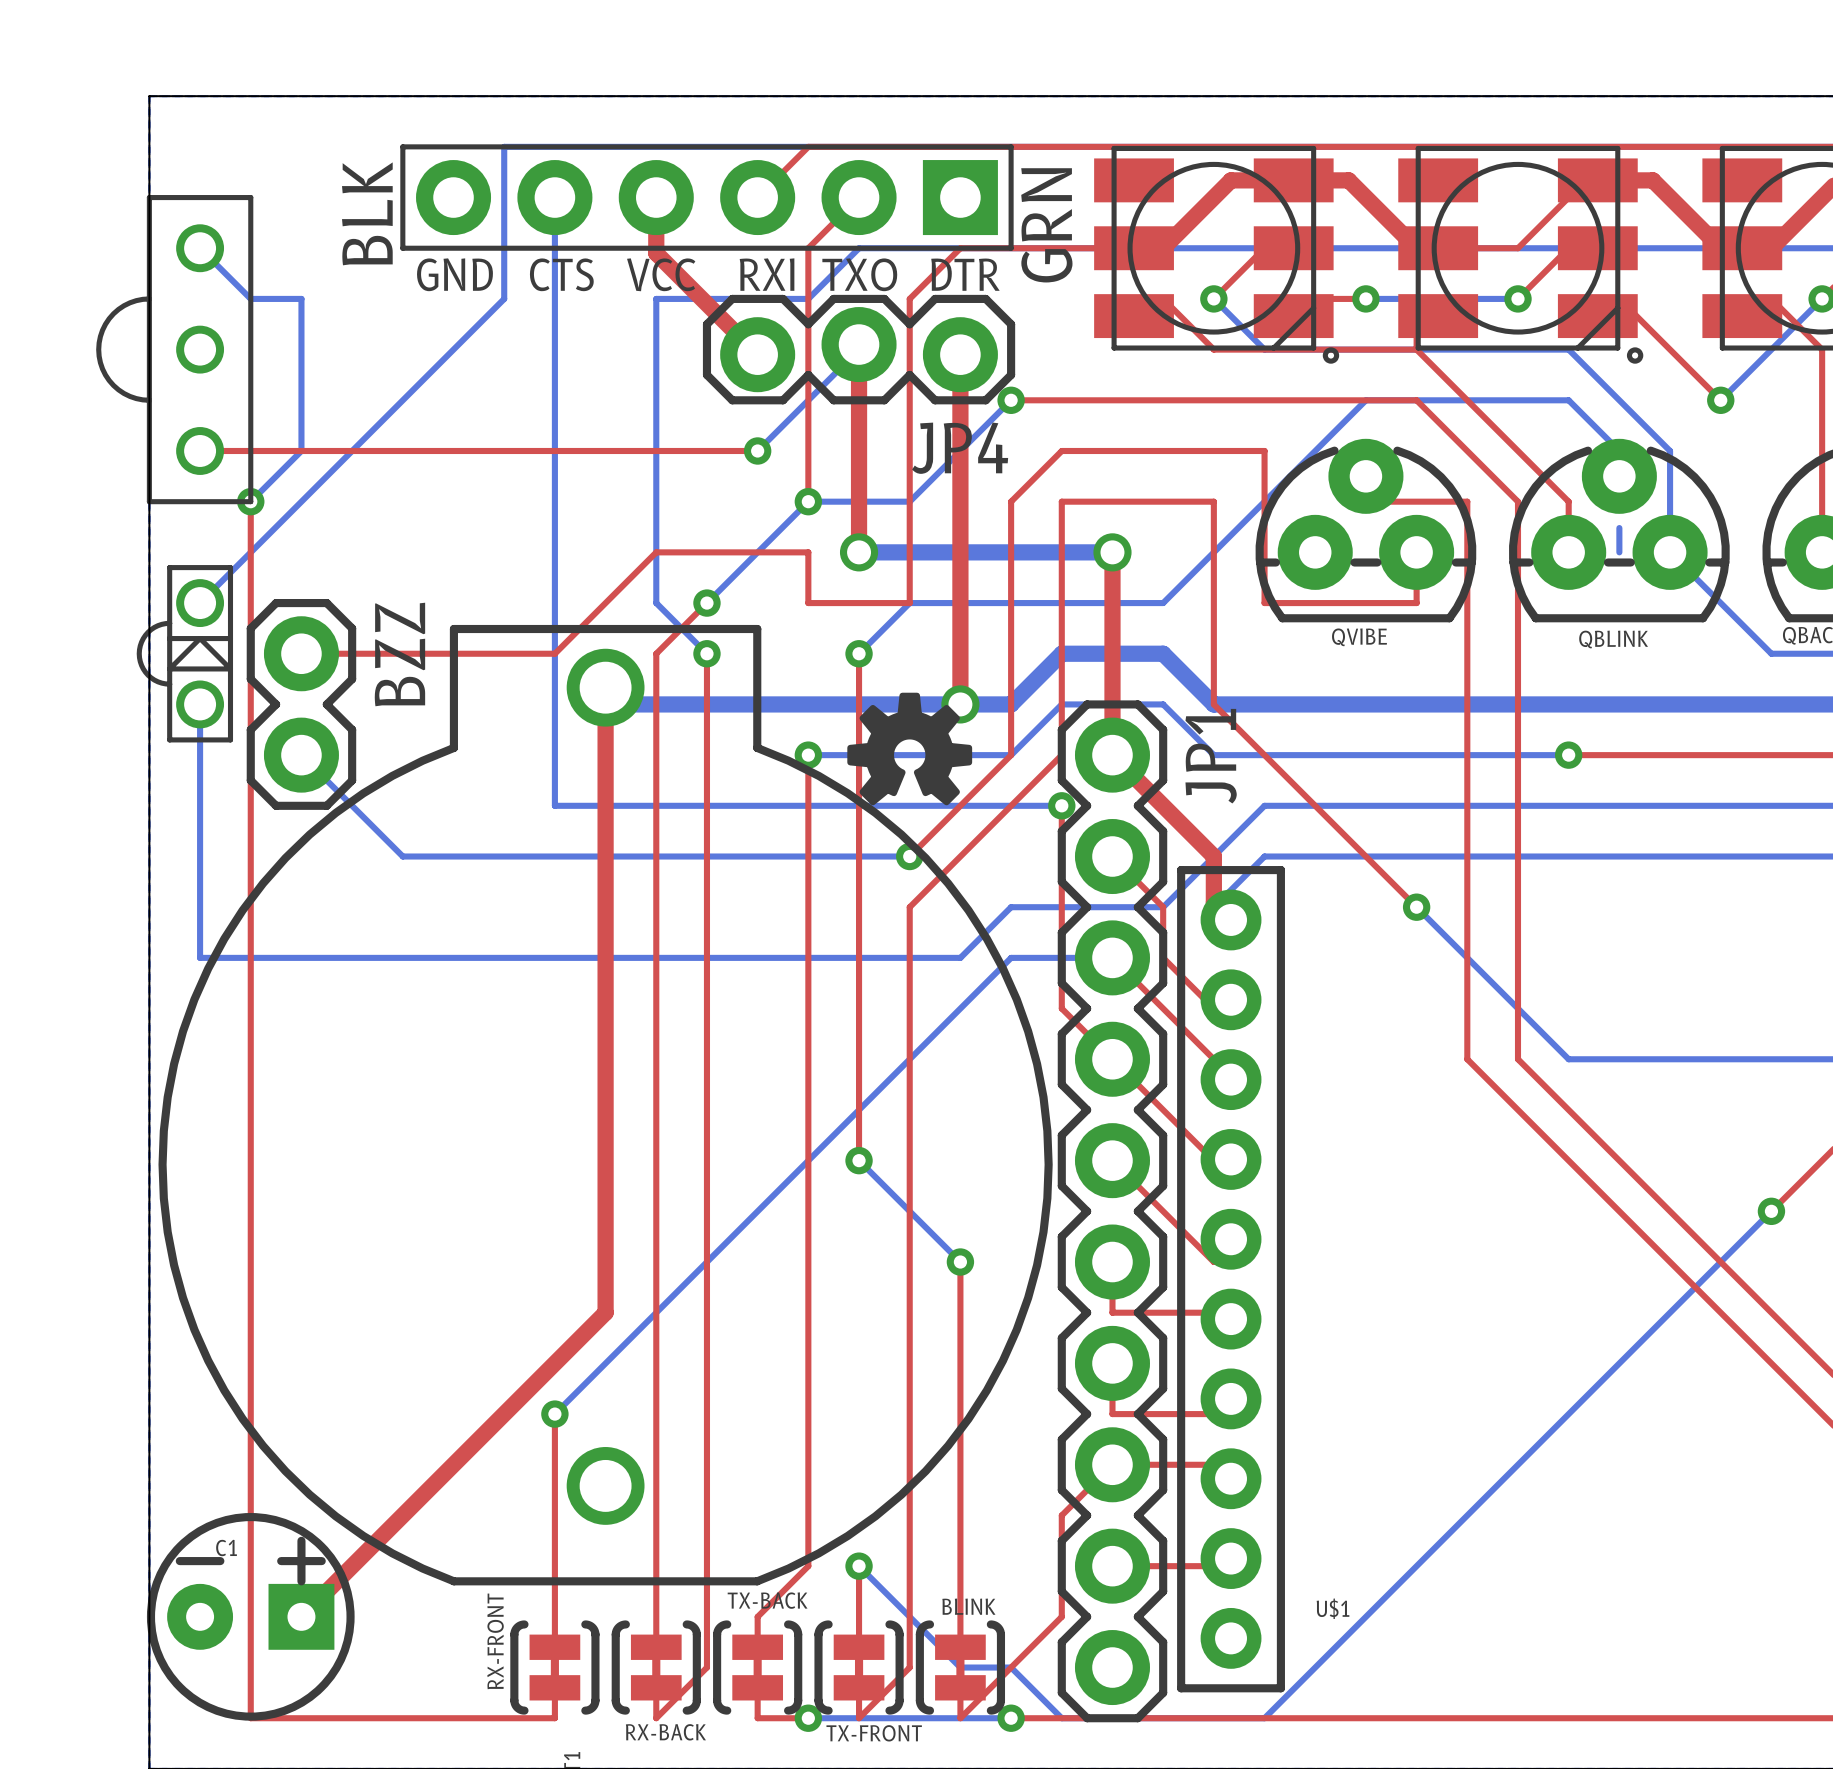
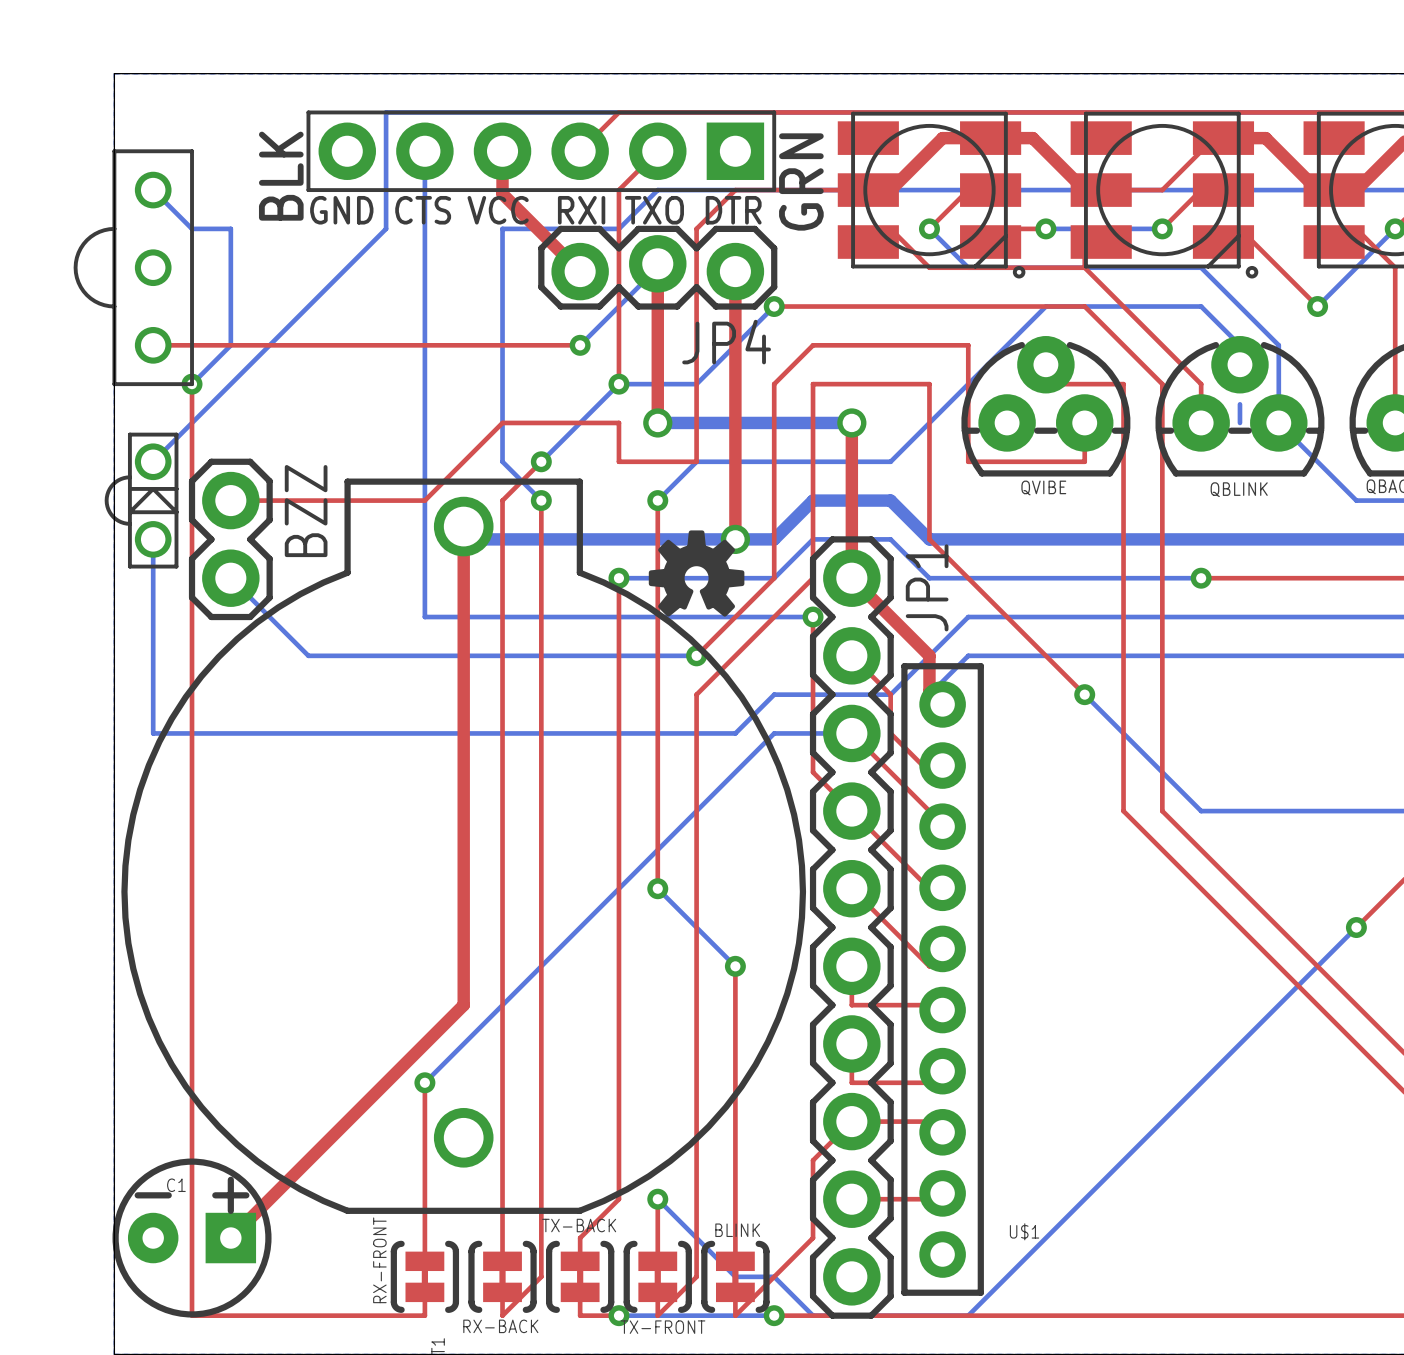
RX-FRONT name position: RX-FRONT (495, 1641) -> RX-FRONT (379, 1260)

